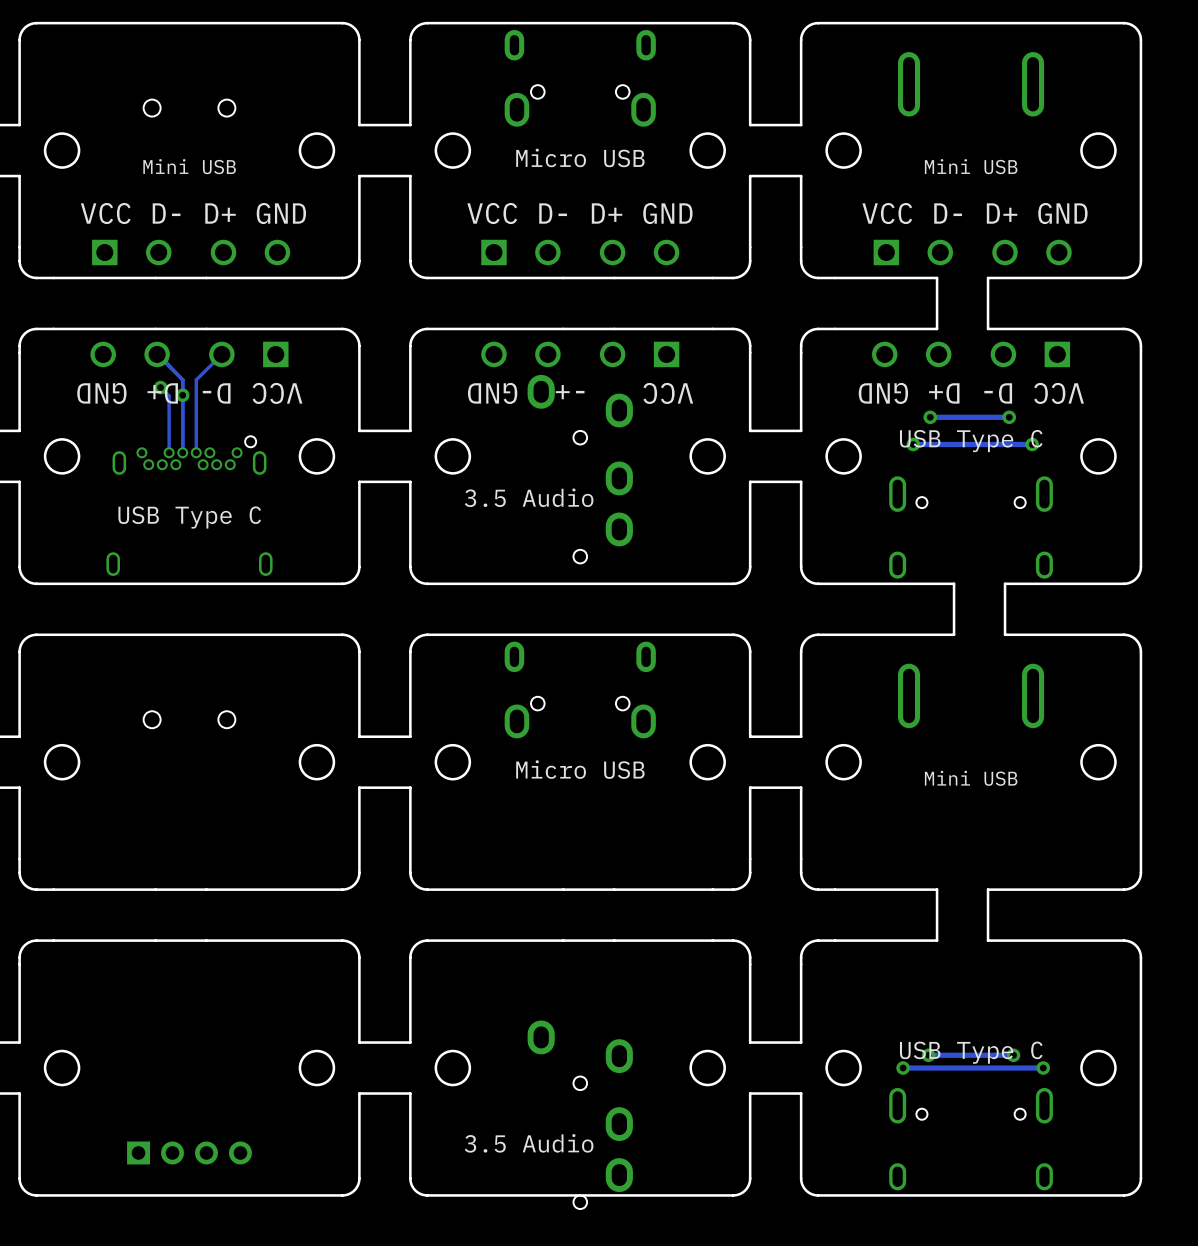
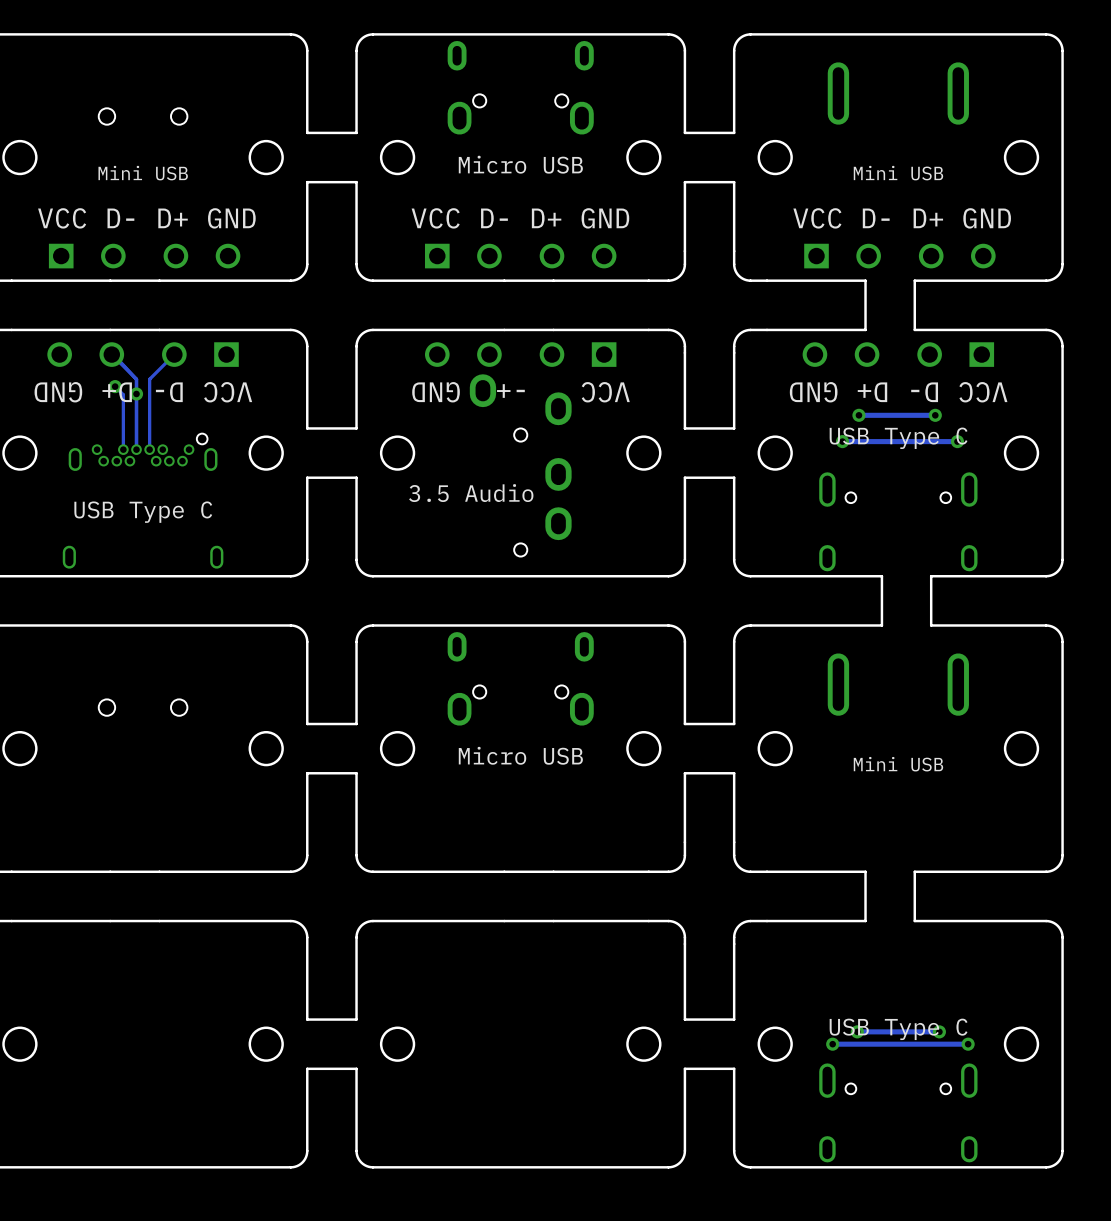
part: 3.5 Audio (580, 1114) -> none
part: (189, 1152) -> none

